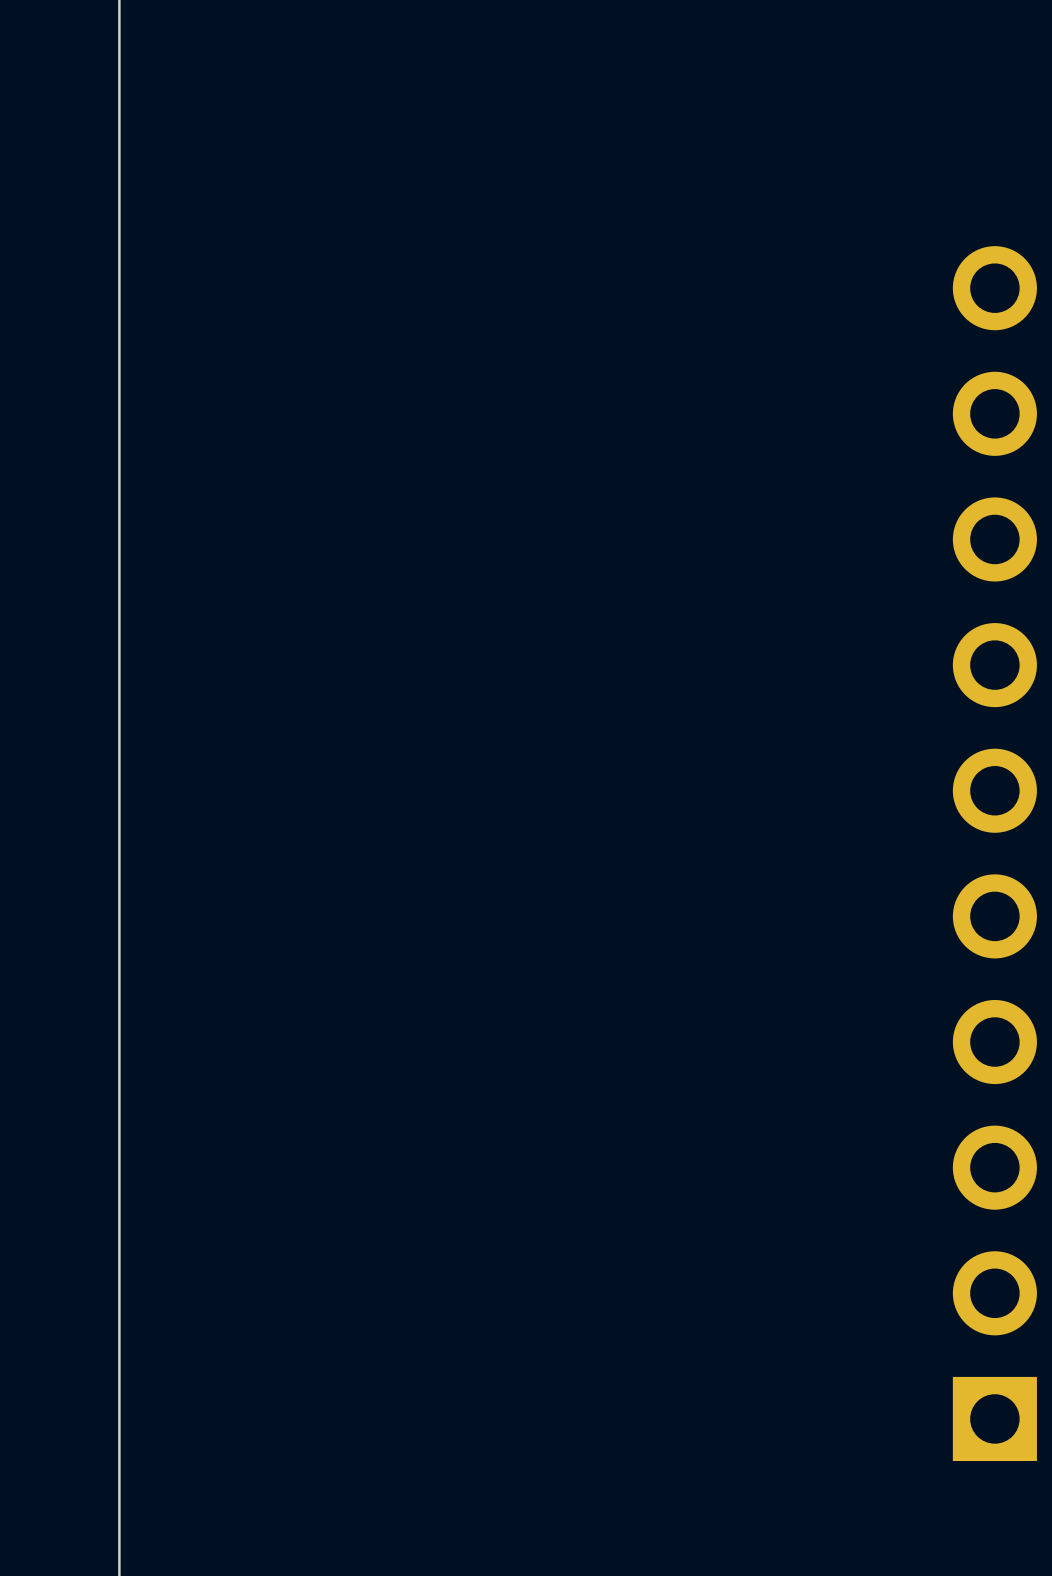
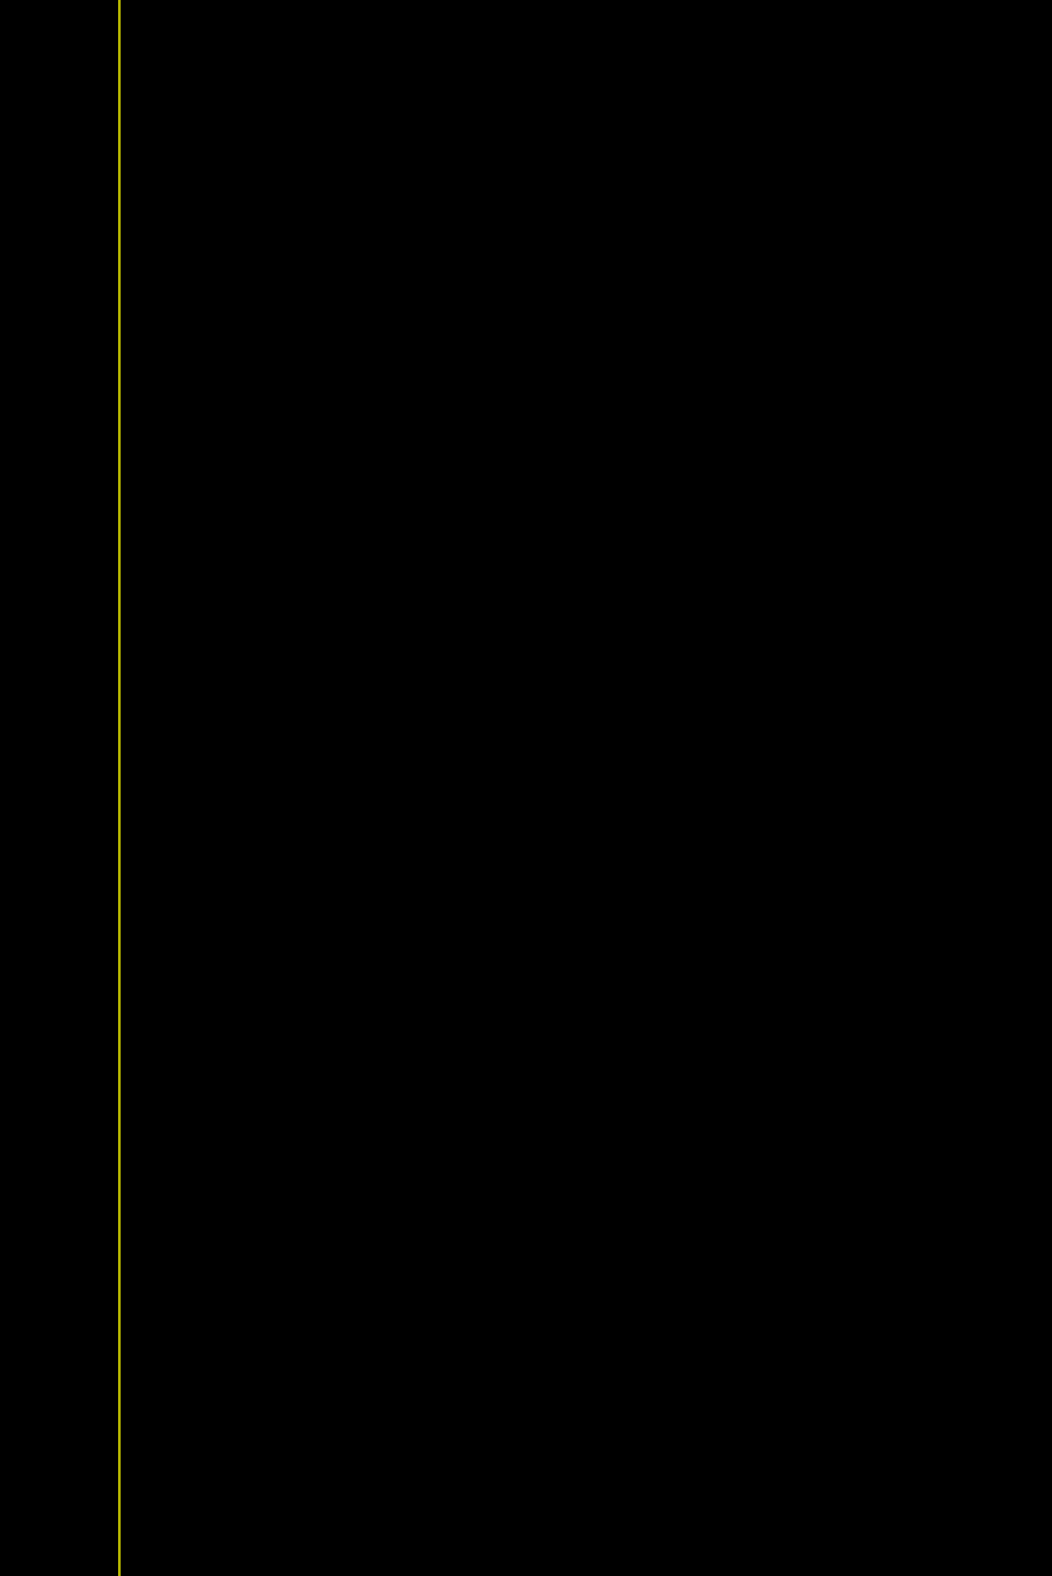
part: (994, 853) -> none

